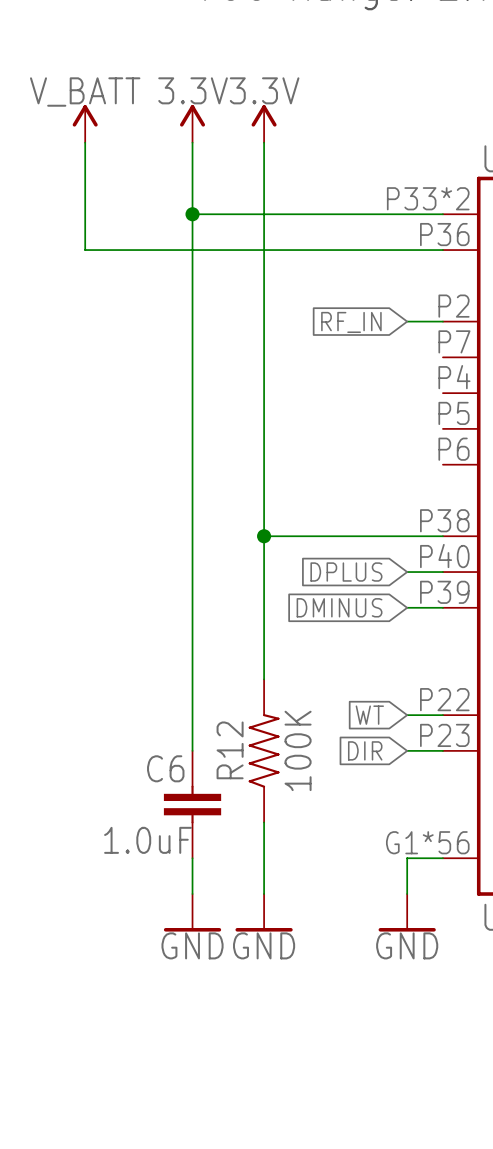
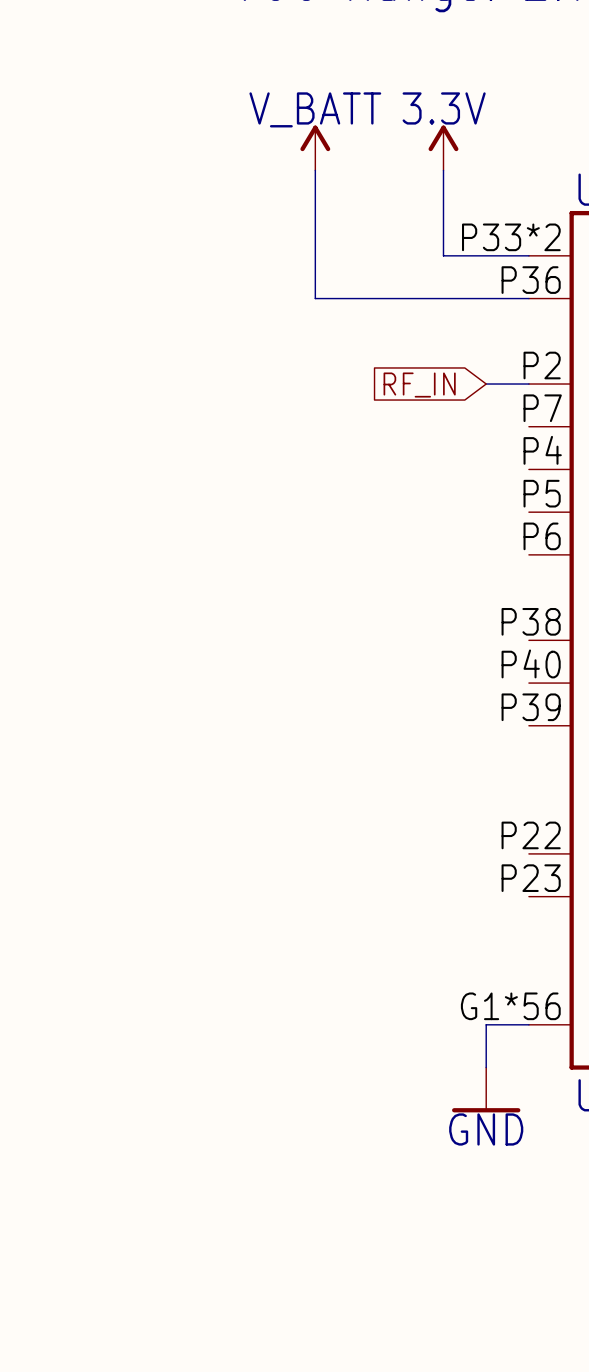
power symbol: V_BATT (85, 123) -> none
power symbol position: 3.3V (192, 123) -> 3.3V (443, 147)
power symbol: 3.3V (264, 123) -> V_BATT (315, 147)
wire: (85, 142) (85, 250) (264, 250) (264, 679) -> none
wire: (192, 142) (192, 750) -> none
wire: (192, 214) (371, 214) -> (443, 170) (443, 255)
junction: (192, 214) -> none
wire: (264, 536) (442, 536) -> none
junction: (264, 536) -> none
global label: DPLUS (346, 572) -> none
wire: (407, 572) (442, 572) -> none
global label: DMINUS (339, 607) -> none
wire: (407, 607) (442, 607) -> none
global label: WT (369, 715) -> none
wire: (407, 715) (442, 715) -> none
R12: 100K (264, 750) -> none
global label: DIR (365, 750) -> none
wire: (407, 750) (442, 750) -> none
C6: 1.0uF (192, 804) -> none
wire: (264, 822) (264, 894) -> none
wire: (192, 858) (192, 894) -> none
power symbol: GND (192, 912) -> none
power symbol: GND (264, 912) -> none

